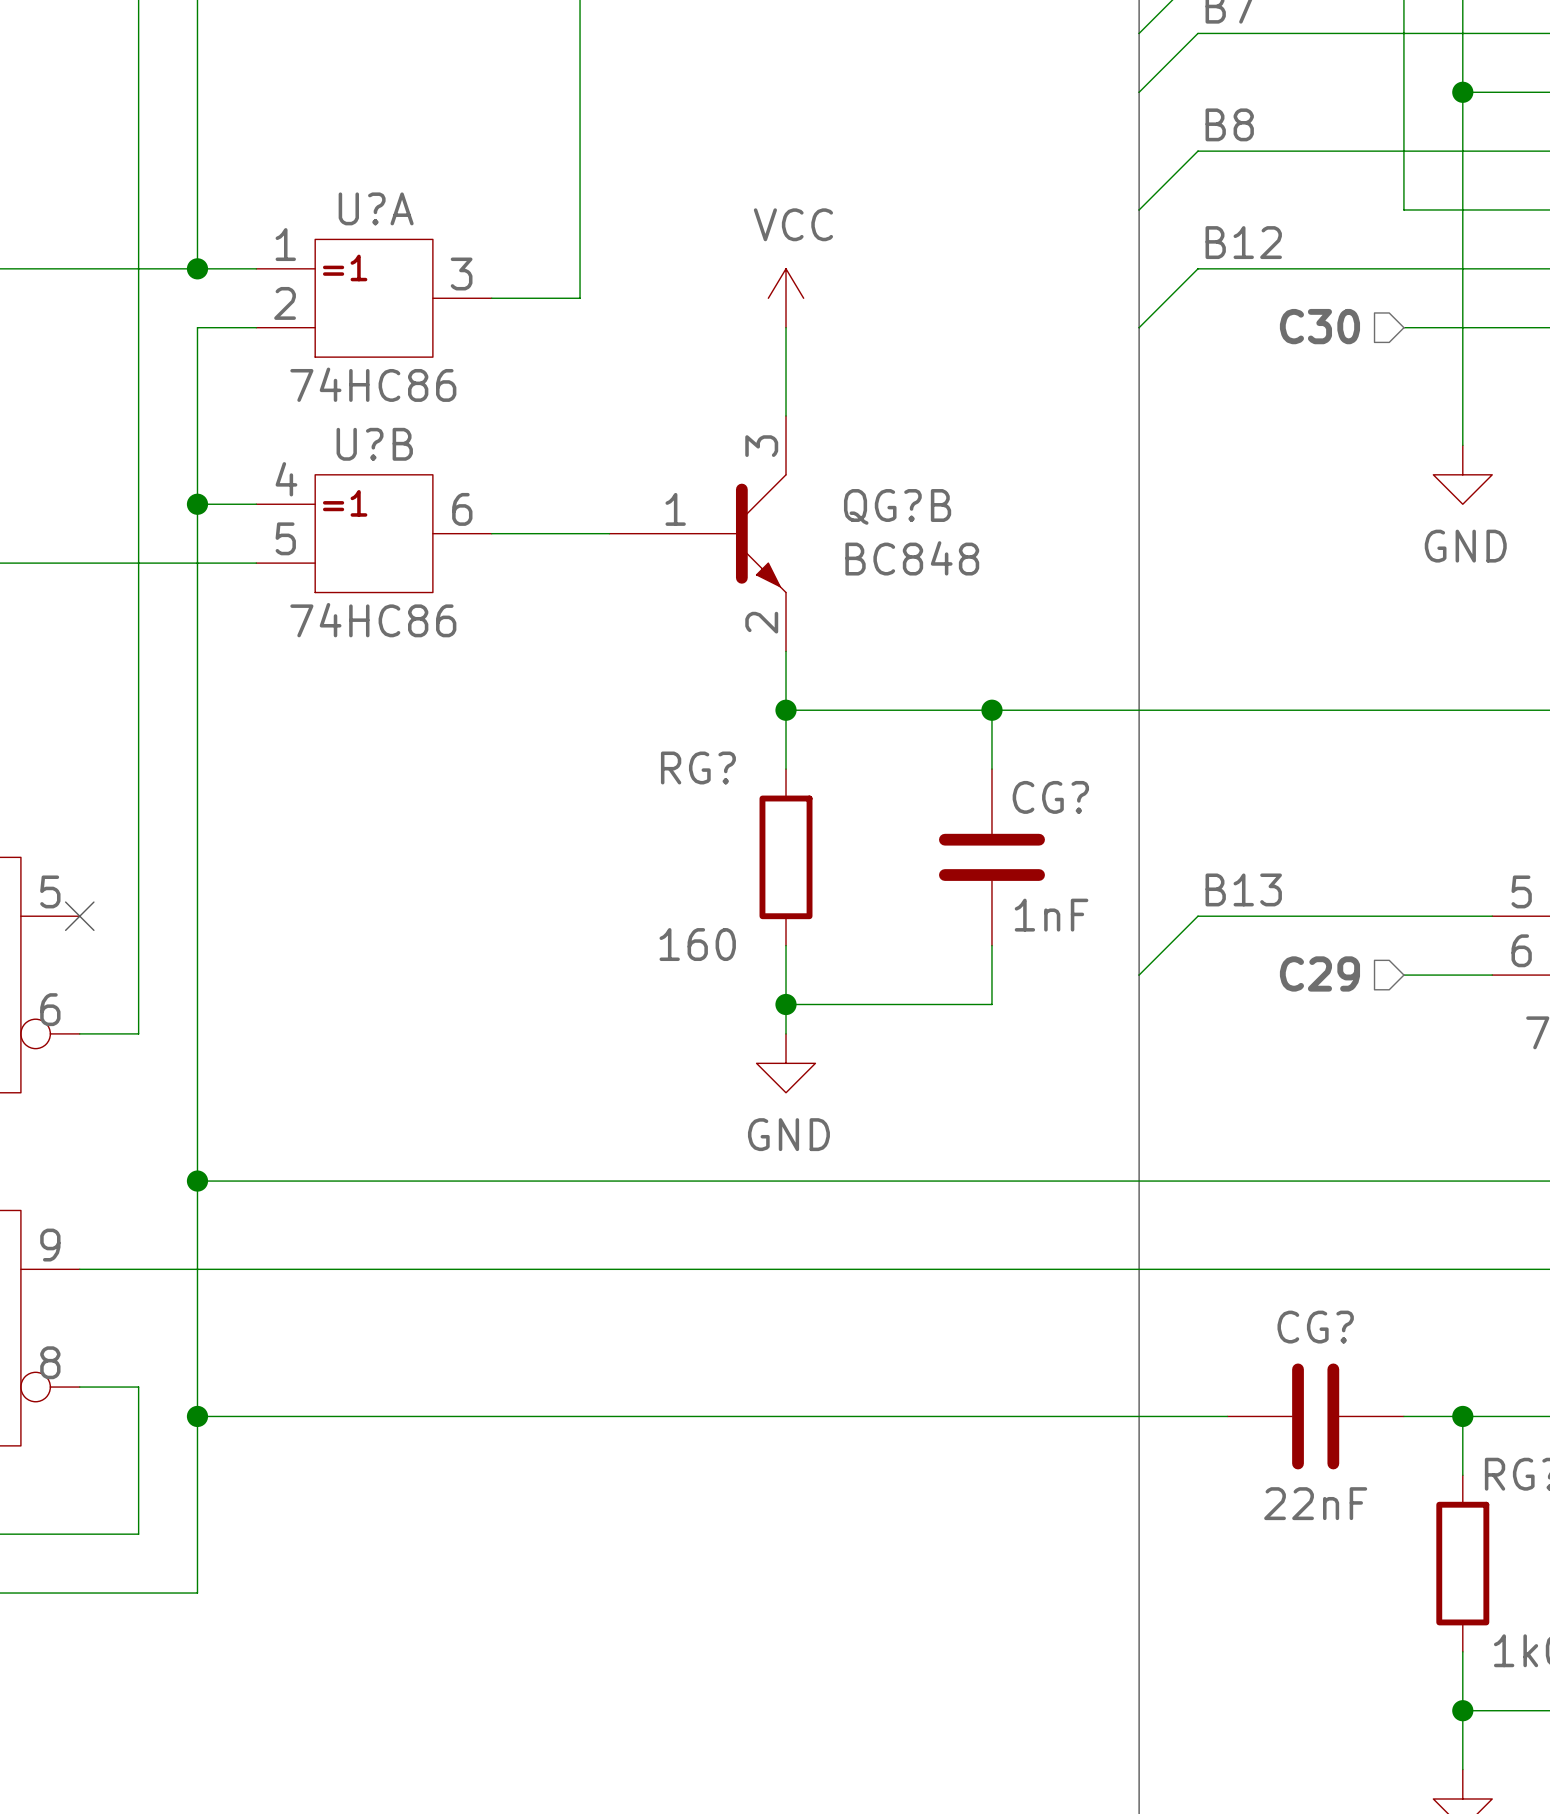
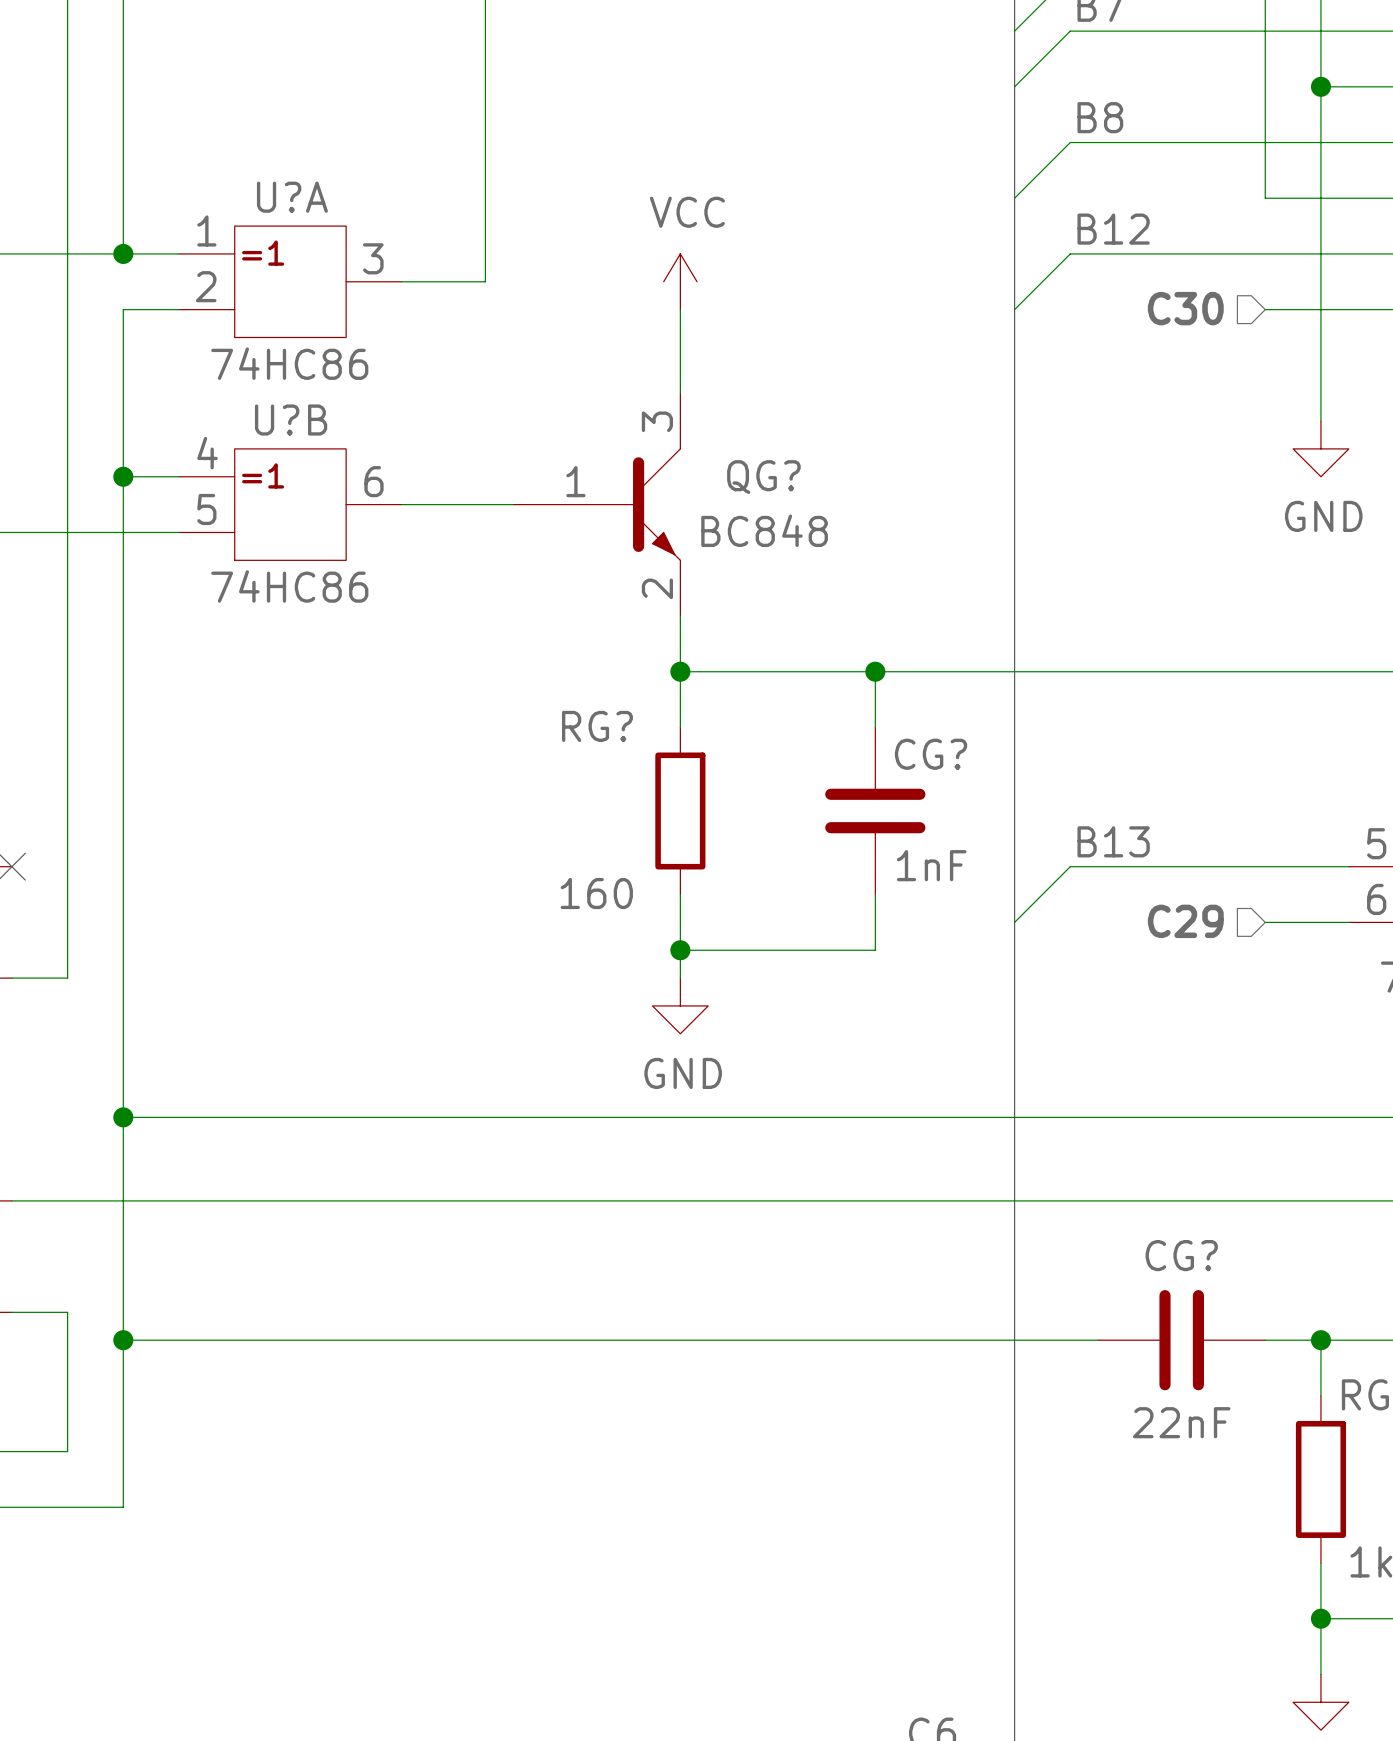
QG?B name: QG?B (897, 506) -> QG? (763, 477)
QG?B value position: BC848 (912, 558) -> BC848 (764, 530)

